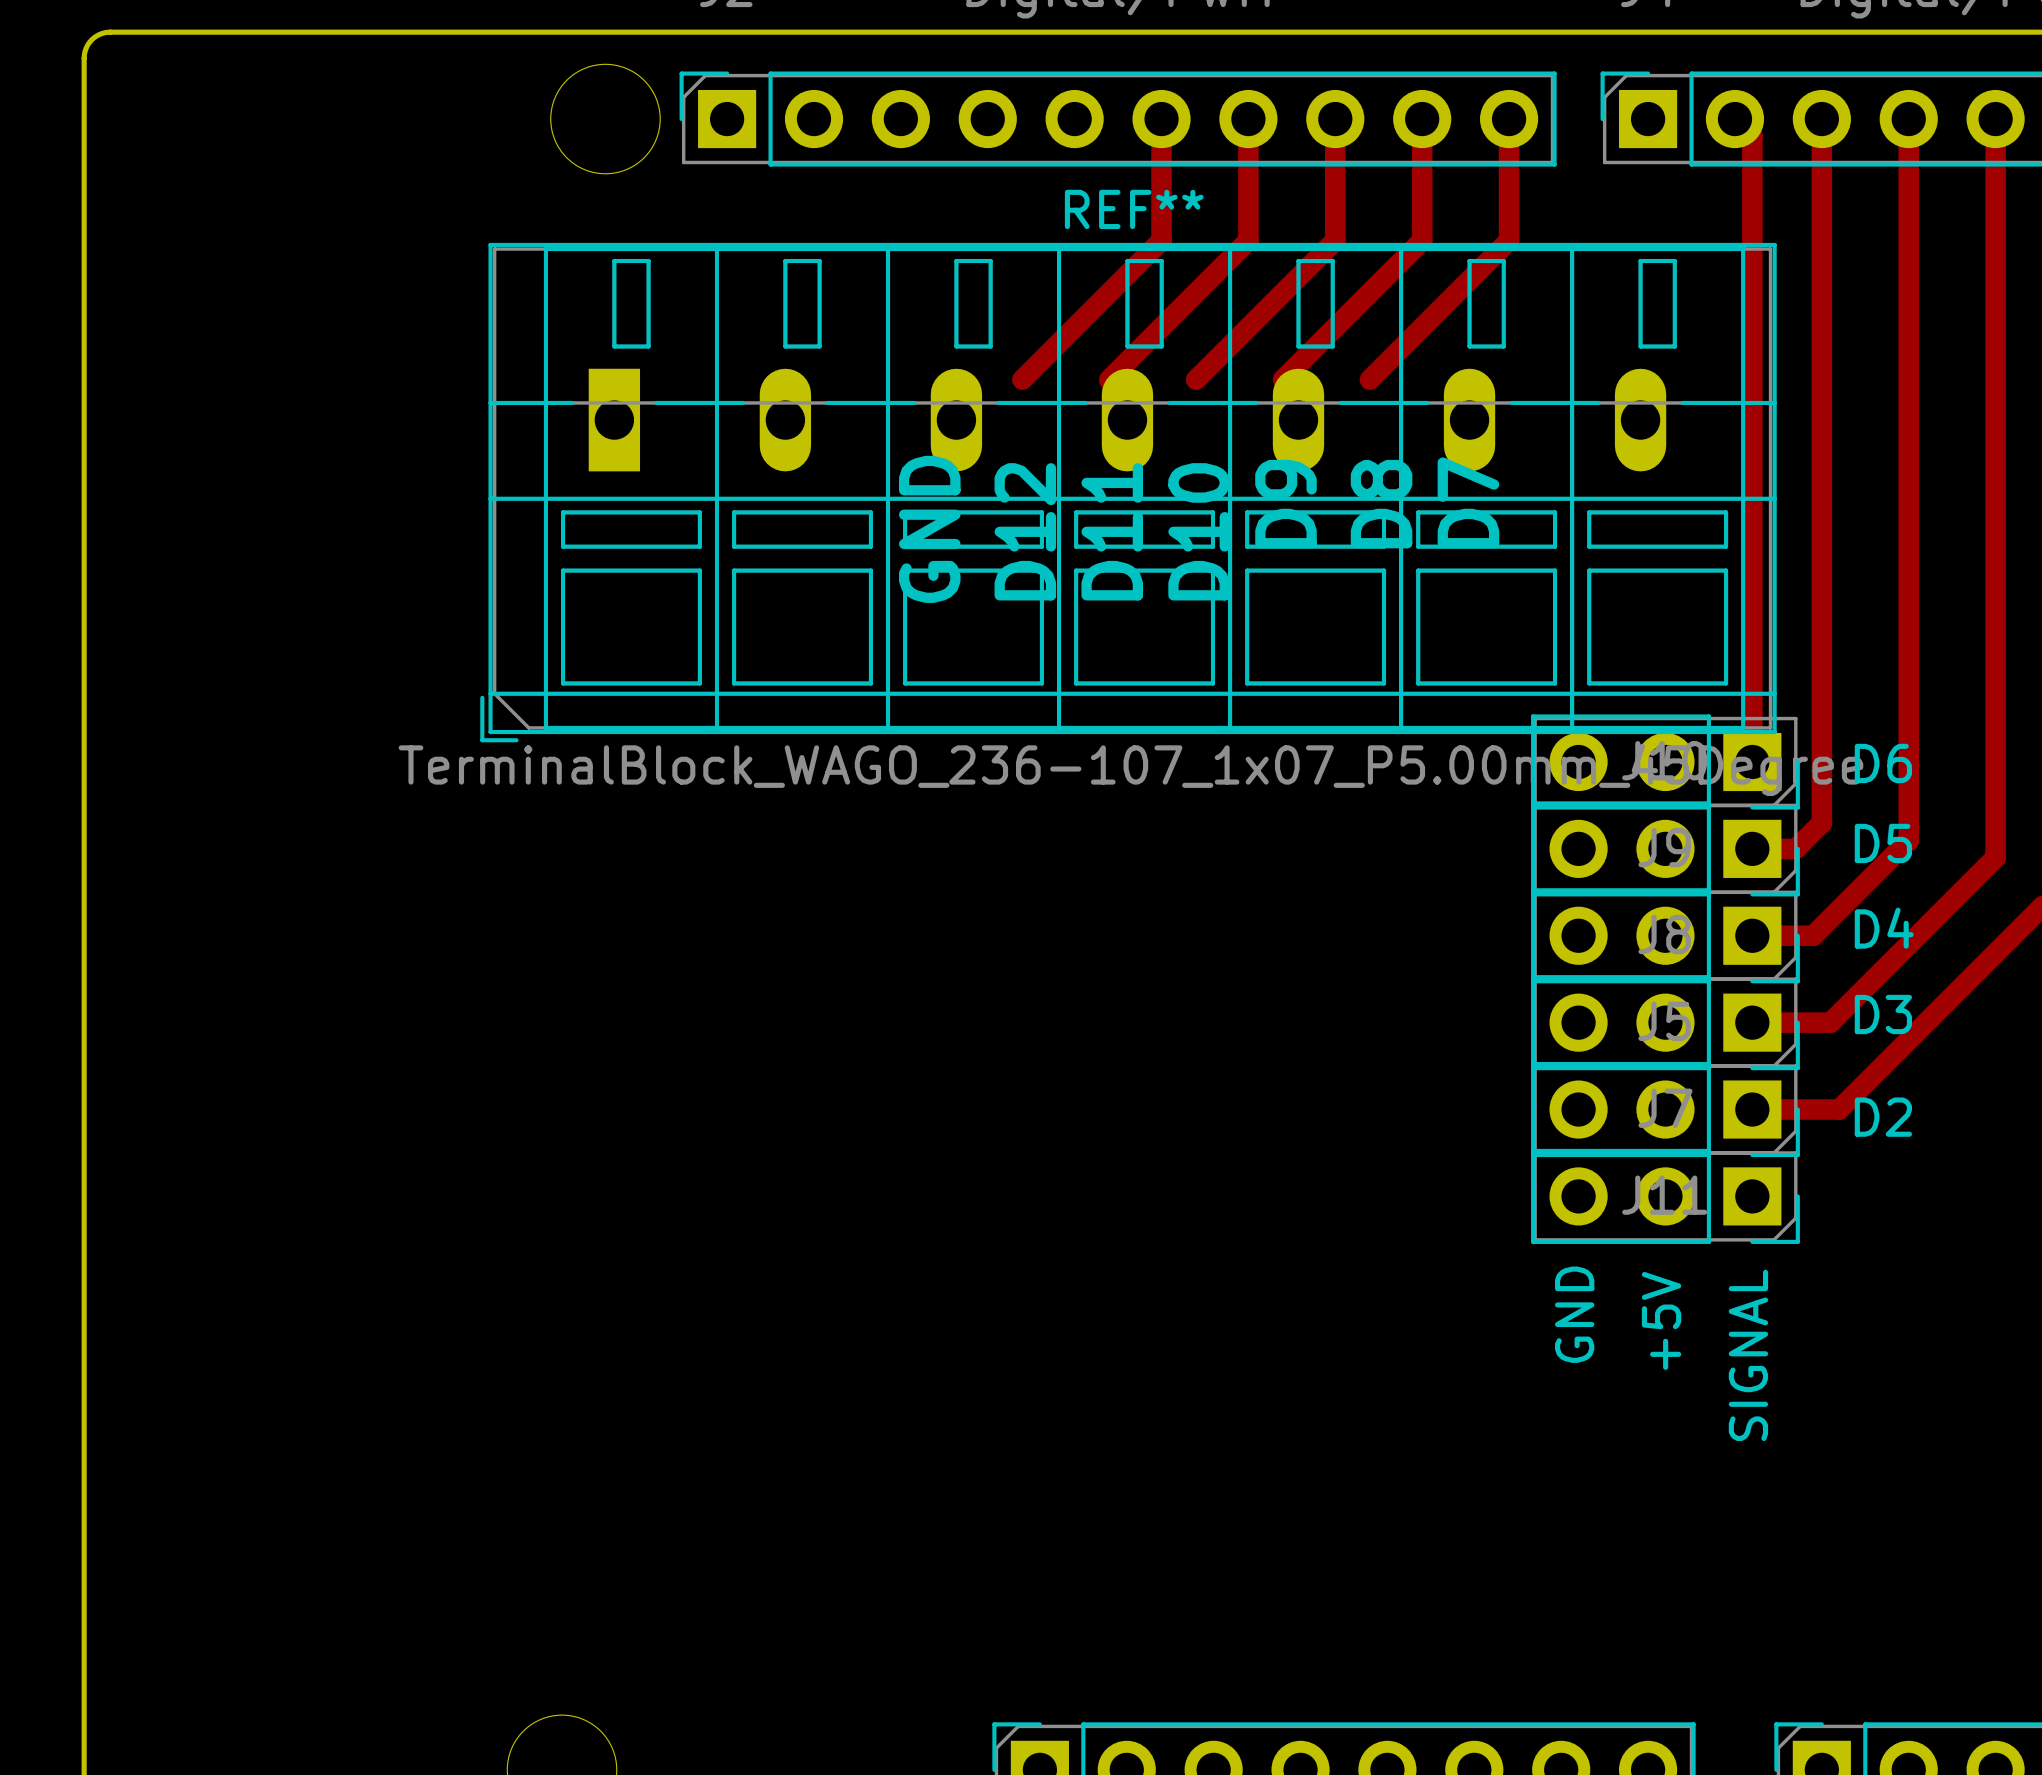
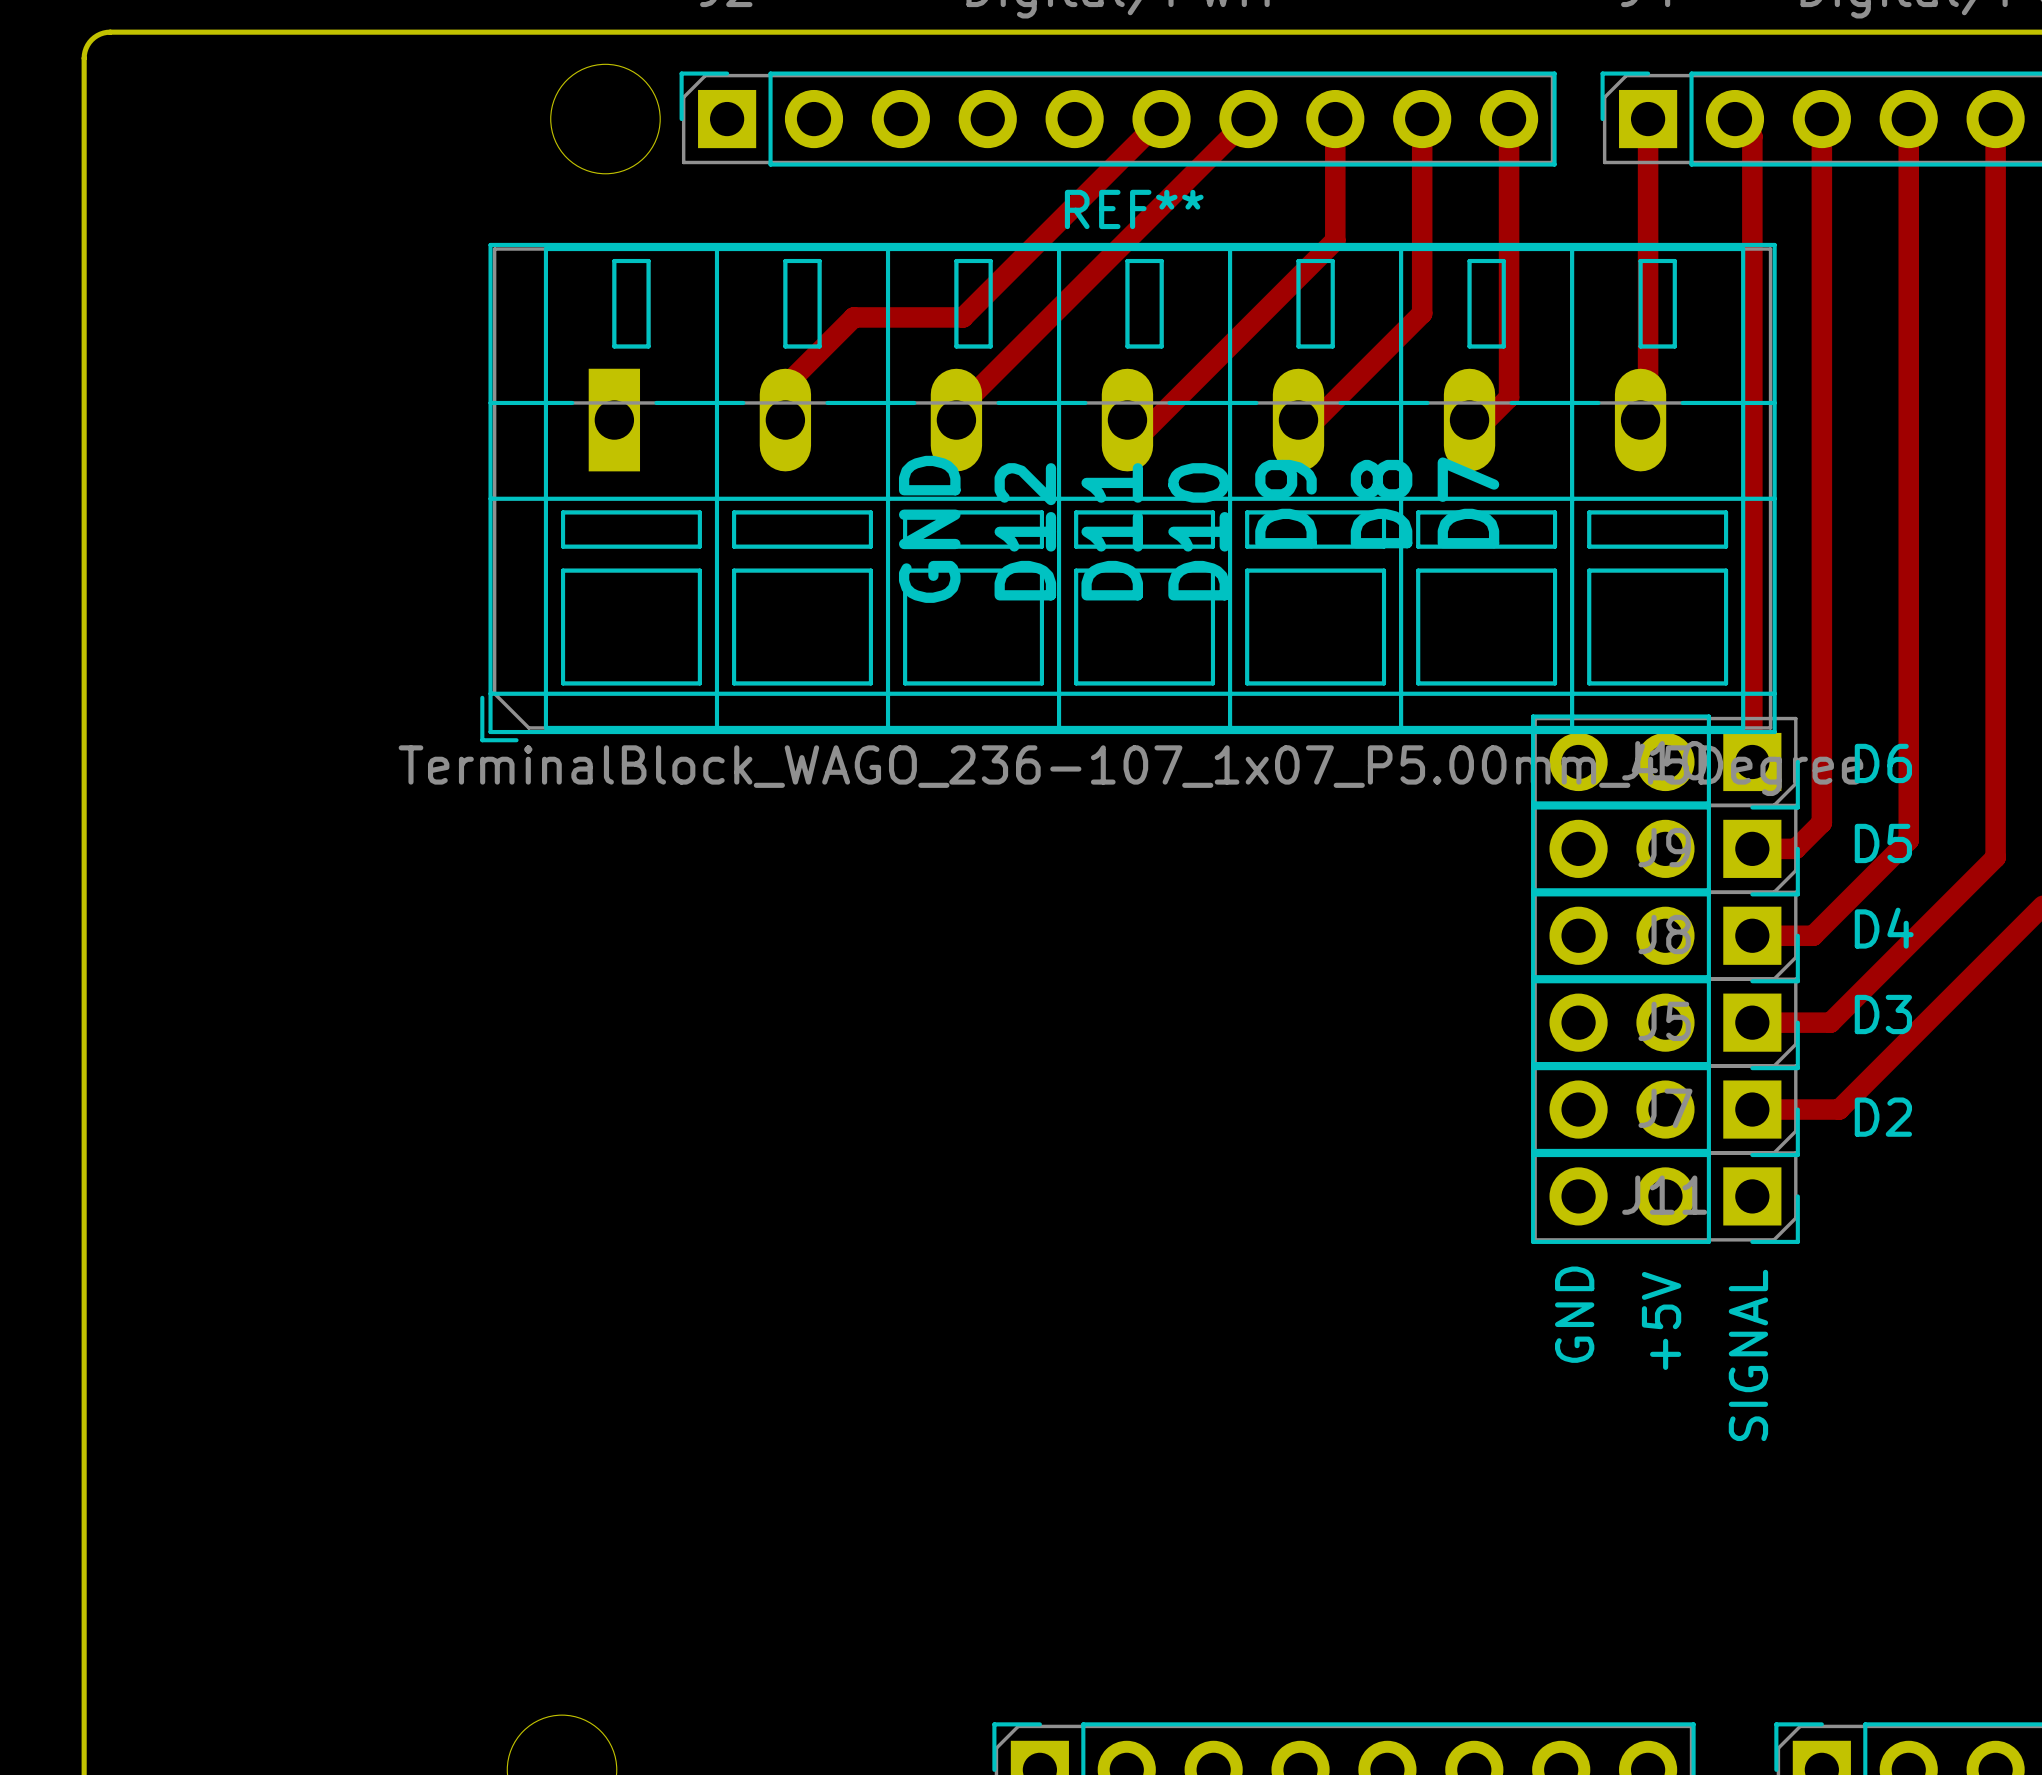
track: (1161, 119) (1161, 240) (1022, 379) -> (1161, 119) (963, 317) (853, 317) (785, 385) (785, 437)
track: (1248, 119) (1248, 240) (1109, 379) -> (1248, 119) (956, 411) (956, 437)
track: none -> (1648, 119) (1648, 429) (1640, 437)
track: (1422, 240) (1283, 379) -> (1422, 240) (1422, 313) (1298, 437)
track: (1508, 240) (1369, 379) -> (1509, 240) (1509, 397) (1469, 437)
track: none -> (1196, 379) (1138, 437) (1127, 437)

